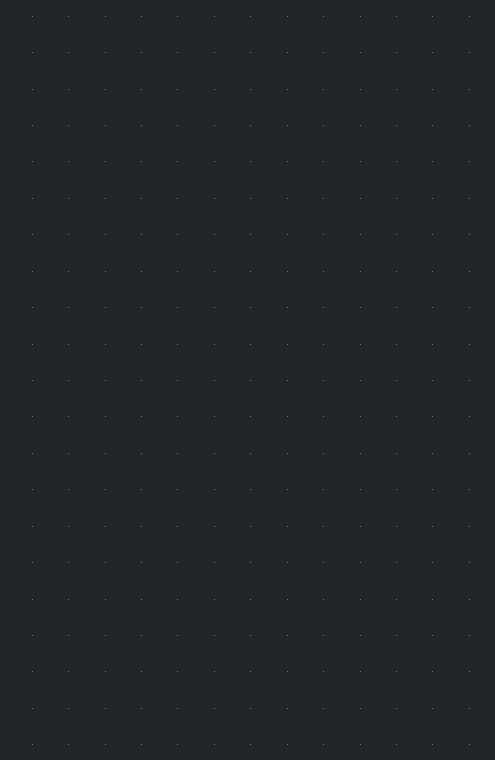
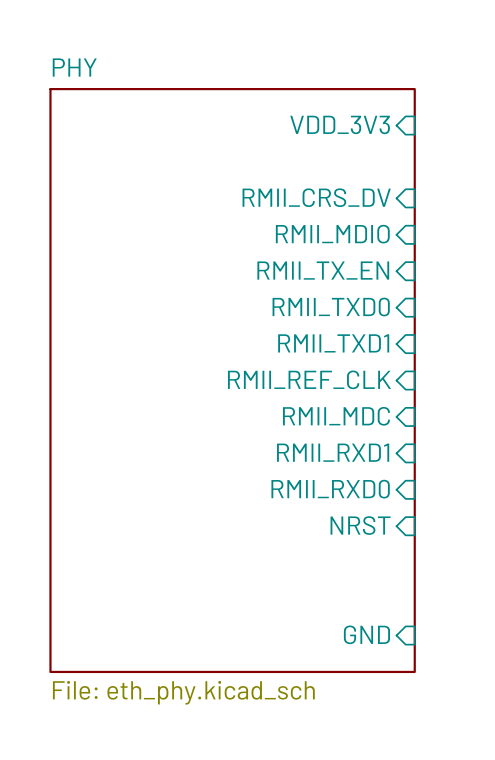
sheet pin: none -> VDD_3V3 (340, 124)
sheet pin: none -> RMII_CRS_DV (316, 197)
sheet pin: none -> RMII_MDIO (332, 234)
sheet pin: none -> RMII_TX_EN (323, 270)
sheet pin: none -> RMII_TXD0 (331, 306)
sheet pin: none -> RMII_TXD1 (333, 343)
sheet PHY: none -> File: eth_phy.kicad_sch (232, 380)
sheet pin: none -> RMII_REF_CLK (309, 379)
sheet pin: none -> RMII_MDC (336, 416)
sheet pin: none -> RMII_RXD1 (333, 452)
sheet pin: none -> RMII_RXD0 (330, 489)
sheet pin: none -> NRST (360, 525)
sheet pin: none -> GND (366, 634)

